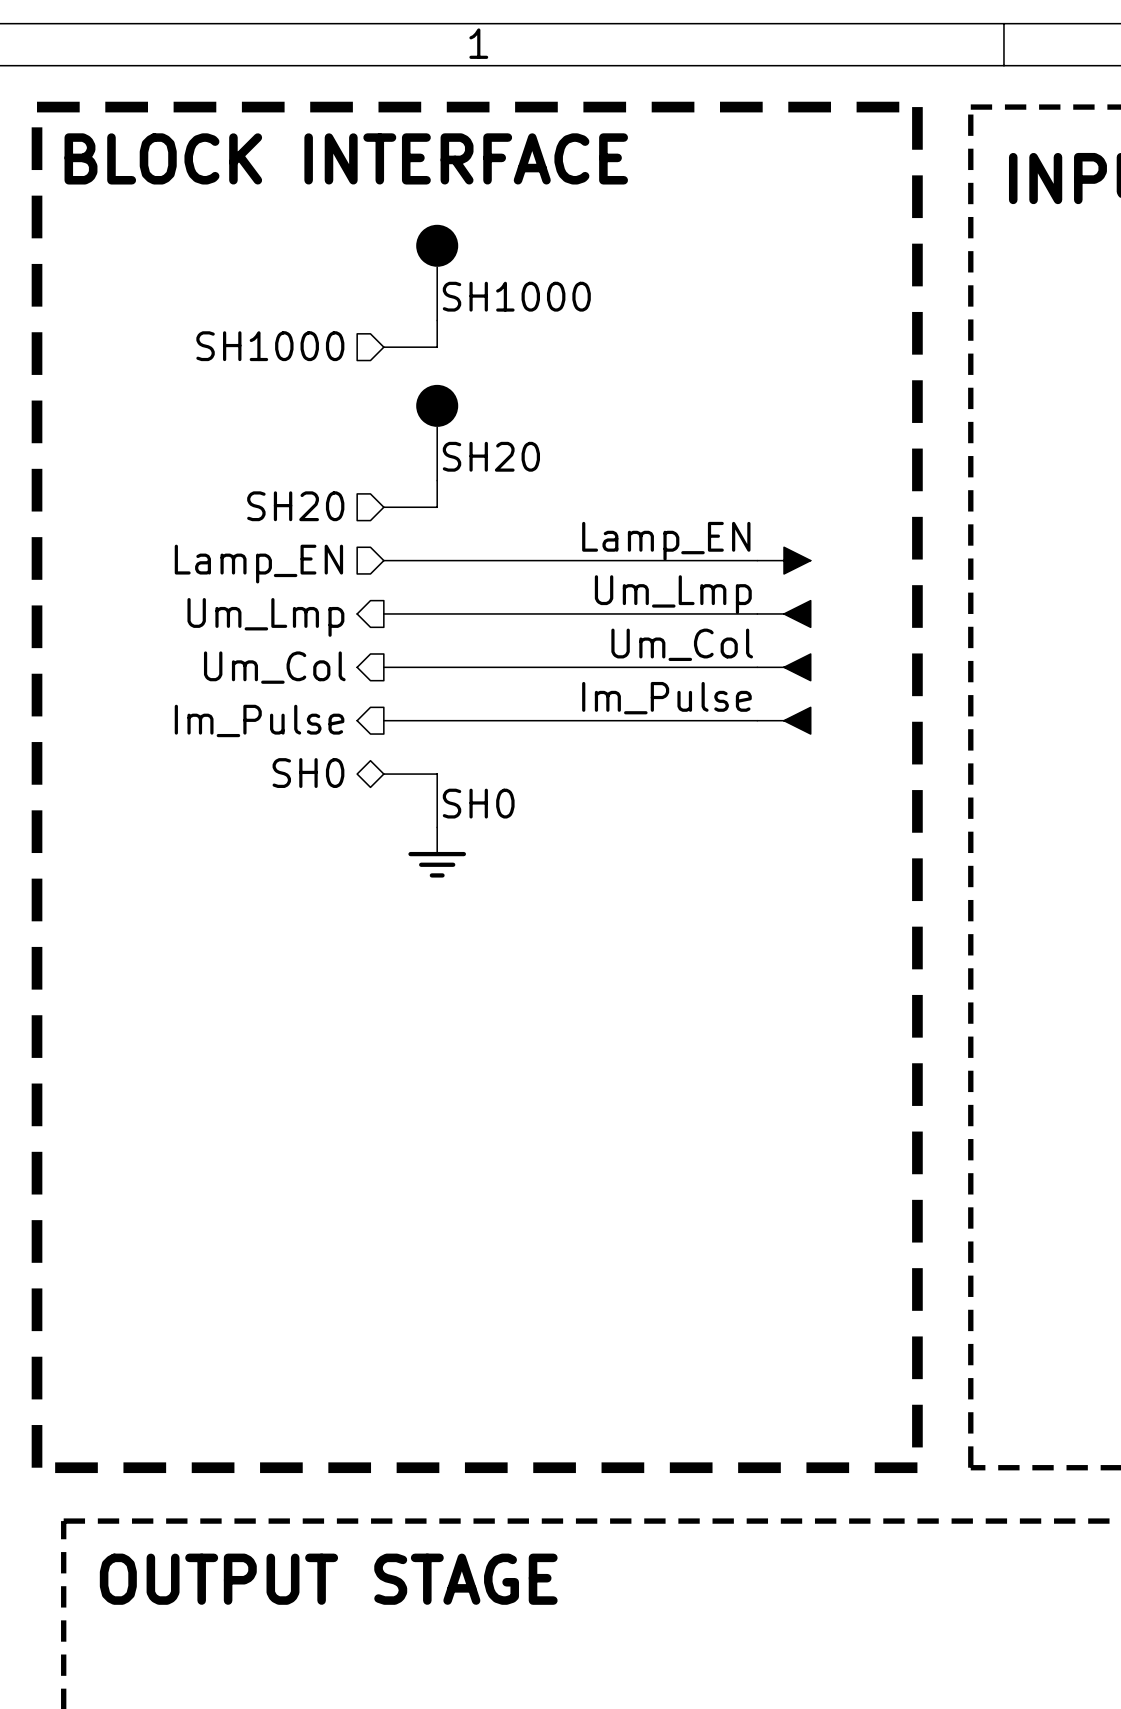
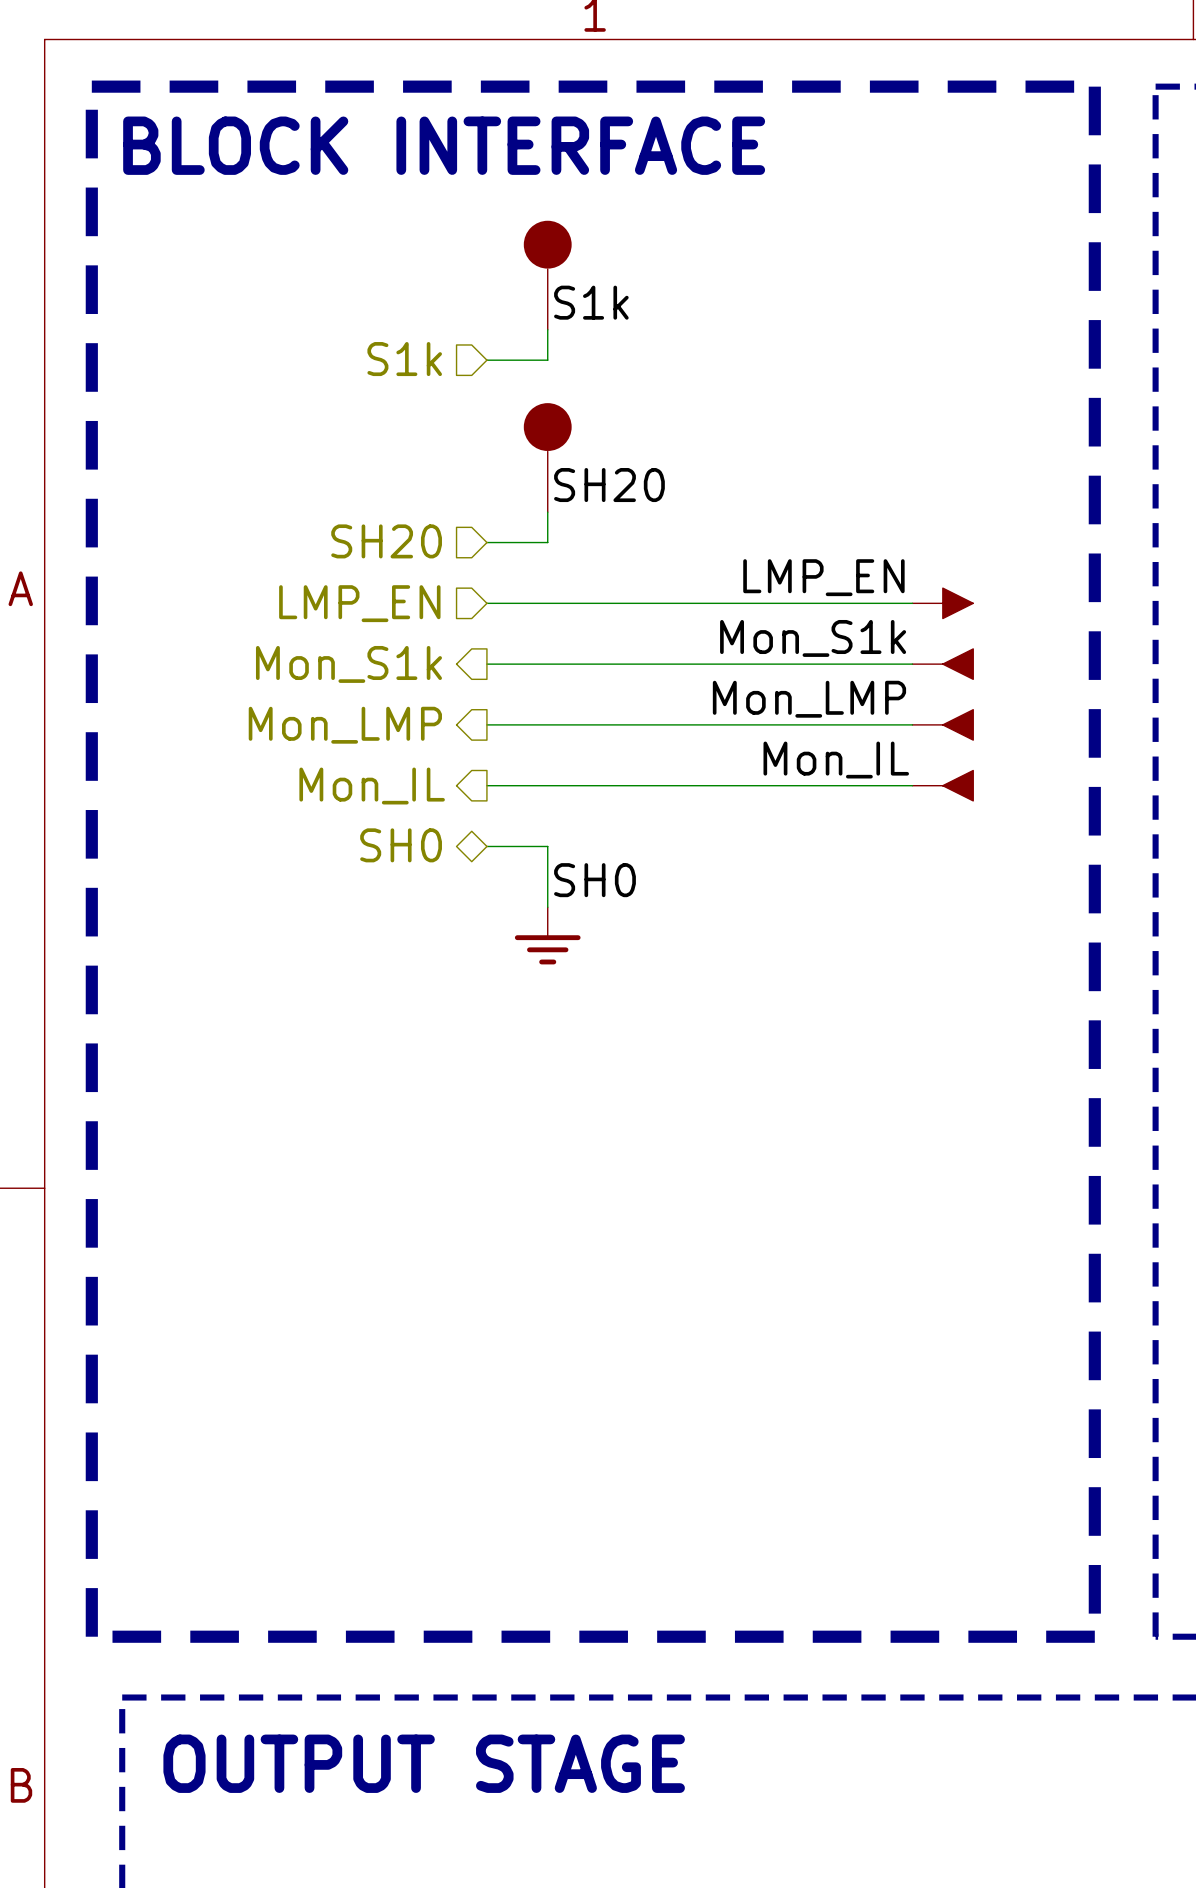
label: SH1000 (516, 296) -> S1k (591, 302)
hierarchical label: SH1000 (270, 346) -> S1k (404, 359)
label: Lamp_EN (666, 541) -> LMP_EN (823, 577)
hierarchical label: Lamp_EN (258, 564) -> LMP_EN (359, 603)
label: Um_Lmp (673, 594) -> Mon_S1k (813, 638)
hierarchical label: Um_Lmp (265, 617) -> Mon_S1k (348, 664)
label: Um_Col (682, 644) -> Mon_LMP (809, 699)
hierarchical label: Um_Col (274, 667) -> Mon_LMP (345, 725)
label: Im_Pulse (666, 698) -> Mon_IL (836, 760)
hierarchical label: Im_Pulse (259, 720) -> Mon_IL (372, 786)

